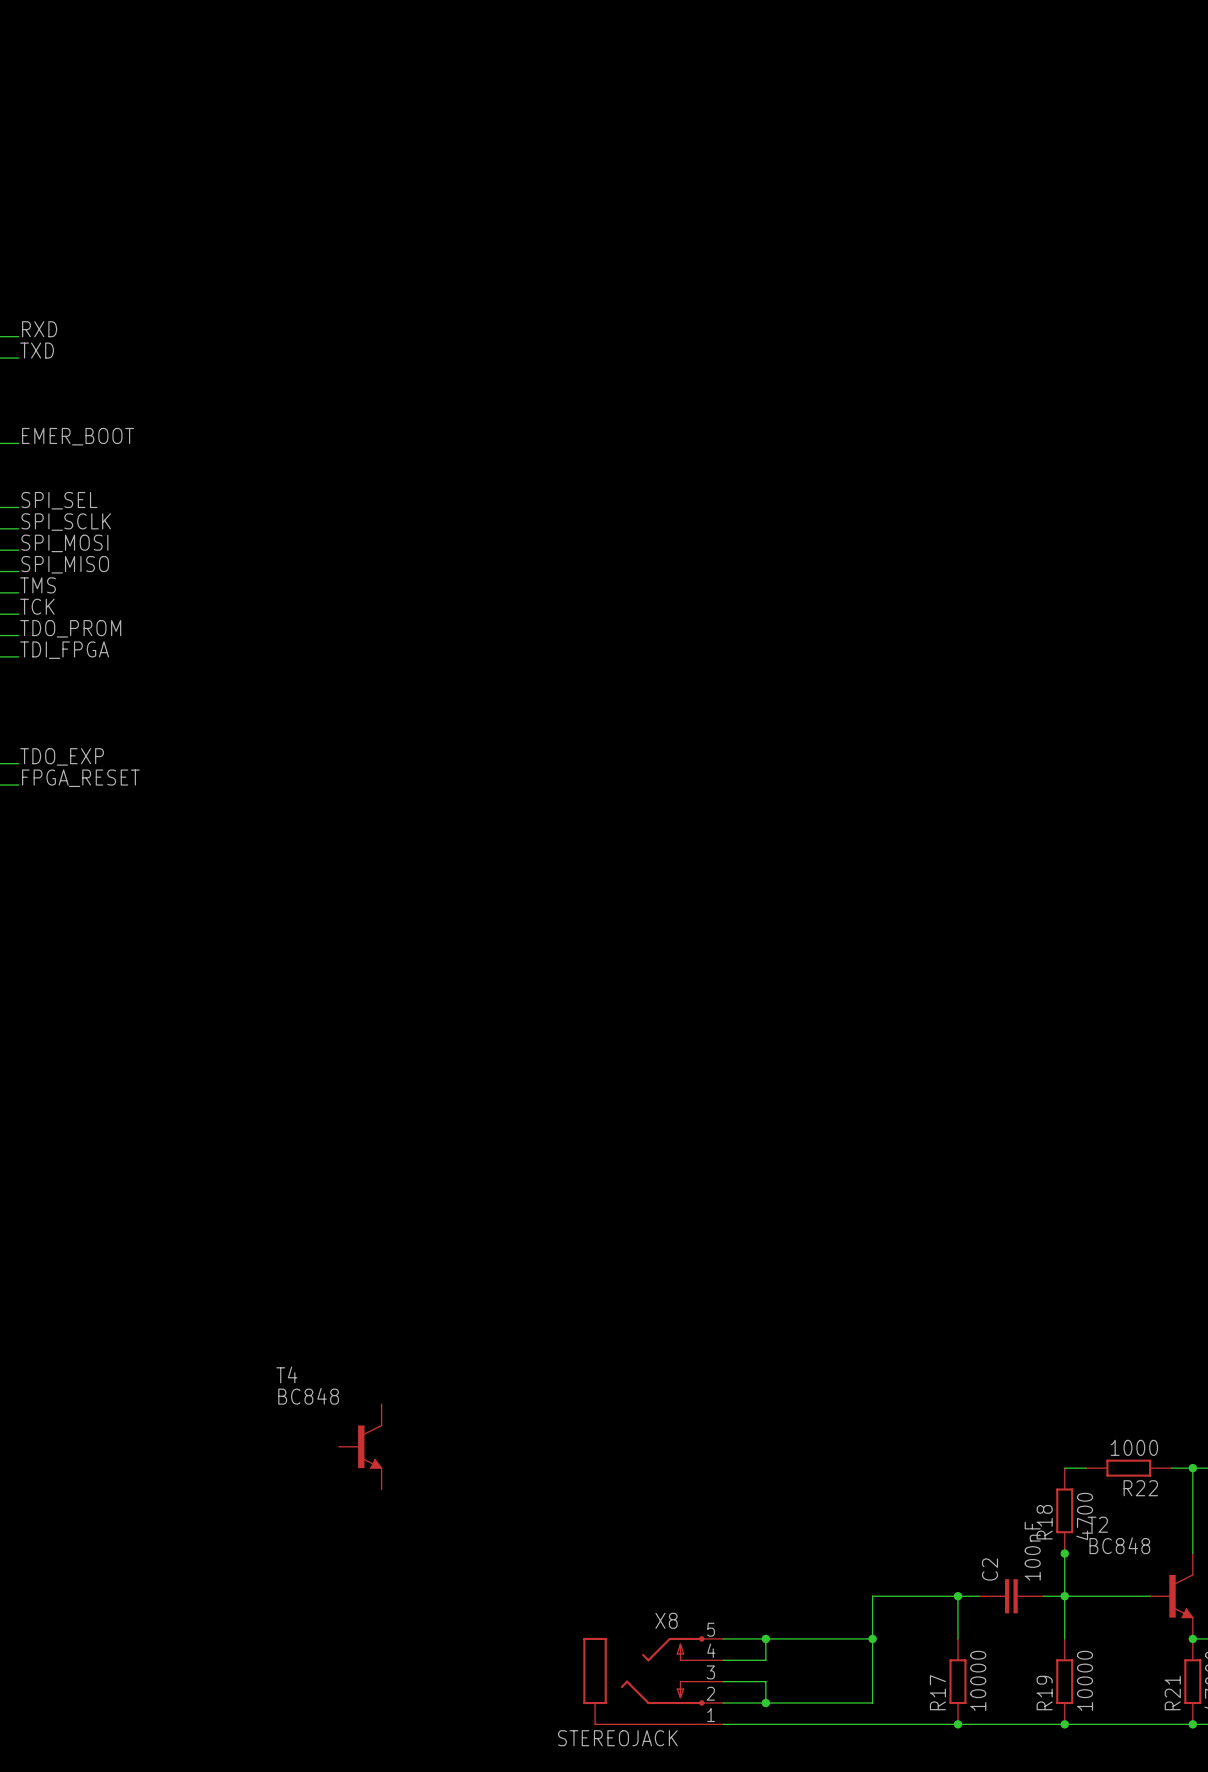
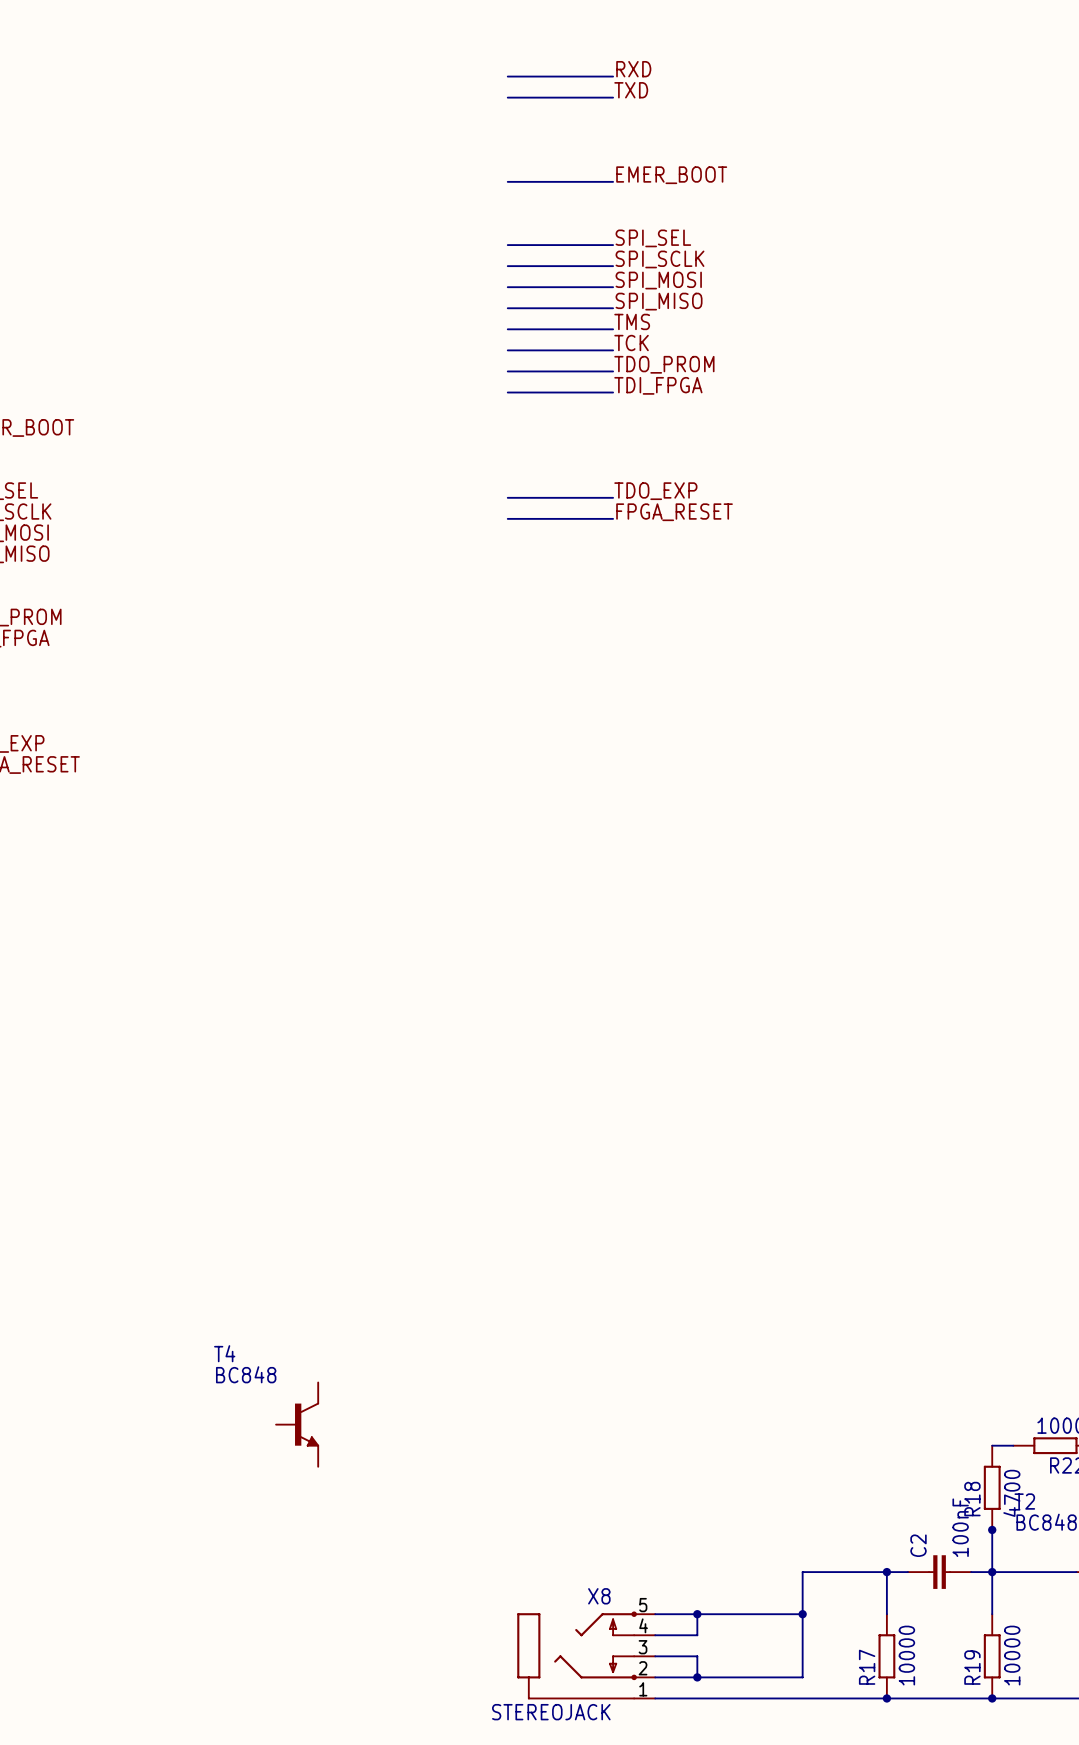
label: none -> RXD (633, 69)
wire: none -> (507, 76) (613, 76)
label: none -> TXD (631, 90)
wire: none -> (507, 97) (613, 97)
label: none -> EMER_BOOT (671, 175)
wire: none -> (507, 181) (613, 181)
label: none -> SPI_SEL (653, 238)
wire: none -> (507, 245) (613, 245)
label: none -> SPI_SCLK (659, 259)
wire: none -> (507, 266) (613, 266)
label: none -> SPI_MOSI (658, 280)
wire: none -> (507, 287) (613, 287)
label: none -> SPI_MISO (659, 301)
wire: none -> (507, 308) (613, 308)
label: none -> TMS (632, 321)
wire: none -> (507, 329) (613, 329)
label: none -> TCK (631, 343)
wire: none -> (507, 350) (613, 350)
label: none -> TDO_PROM (664, 364)
wire: none -> (507, 371) (613, 371)
label: none -> TDI_FPGA (658, 385)
wire: none -> (507, 392) (613, 392)
label: none -> TDO_EXP (655, 491)
wire: none -> (507, 497) (613, 497)
label: none -> FPGA_RESET (674, 512)
wire: none -> (507, 518) (613, 518)

